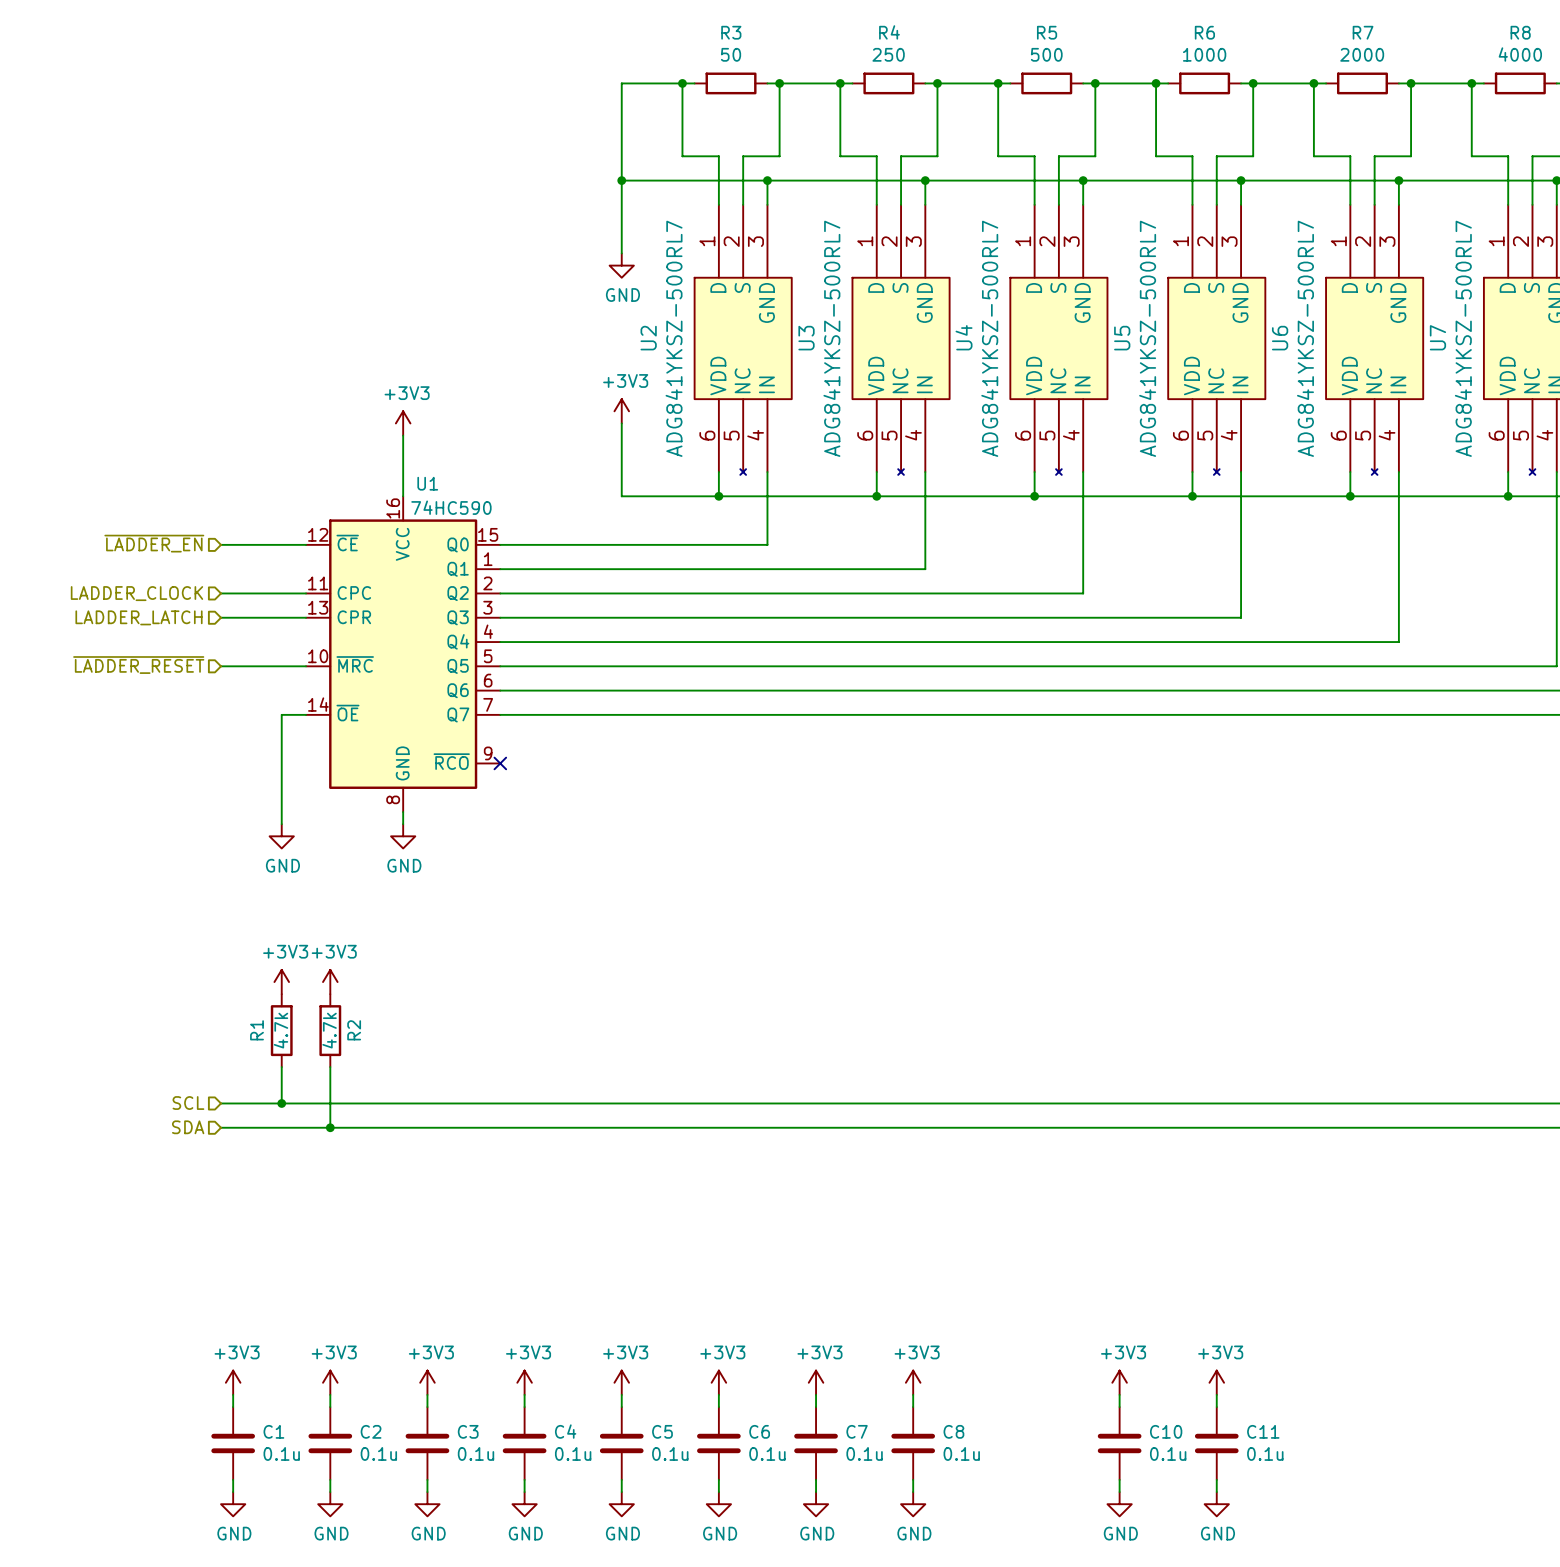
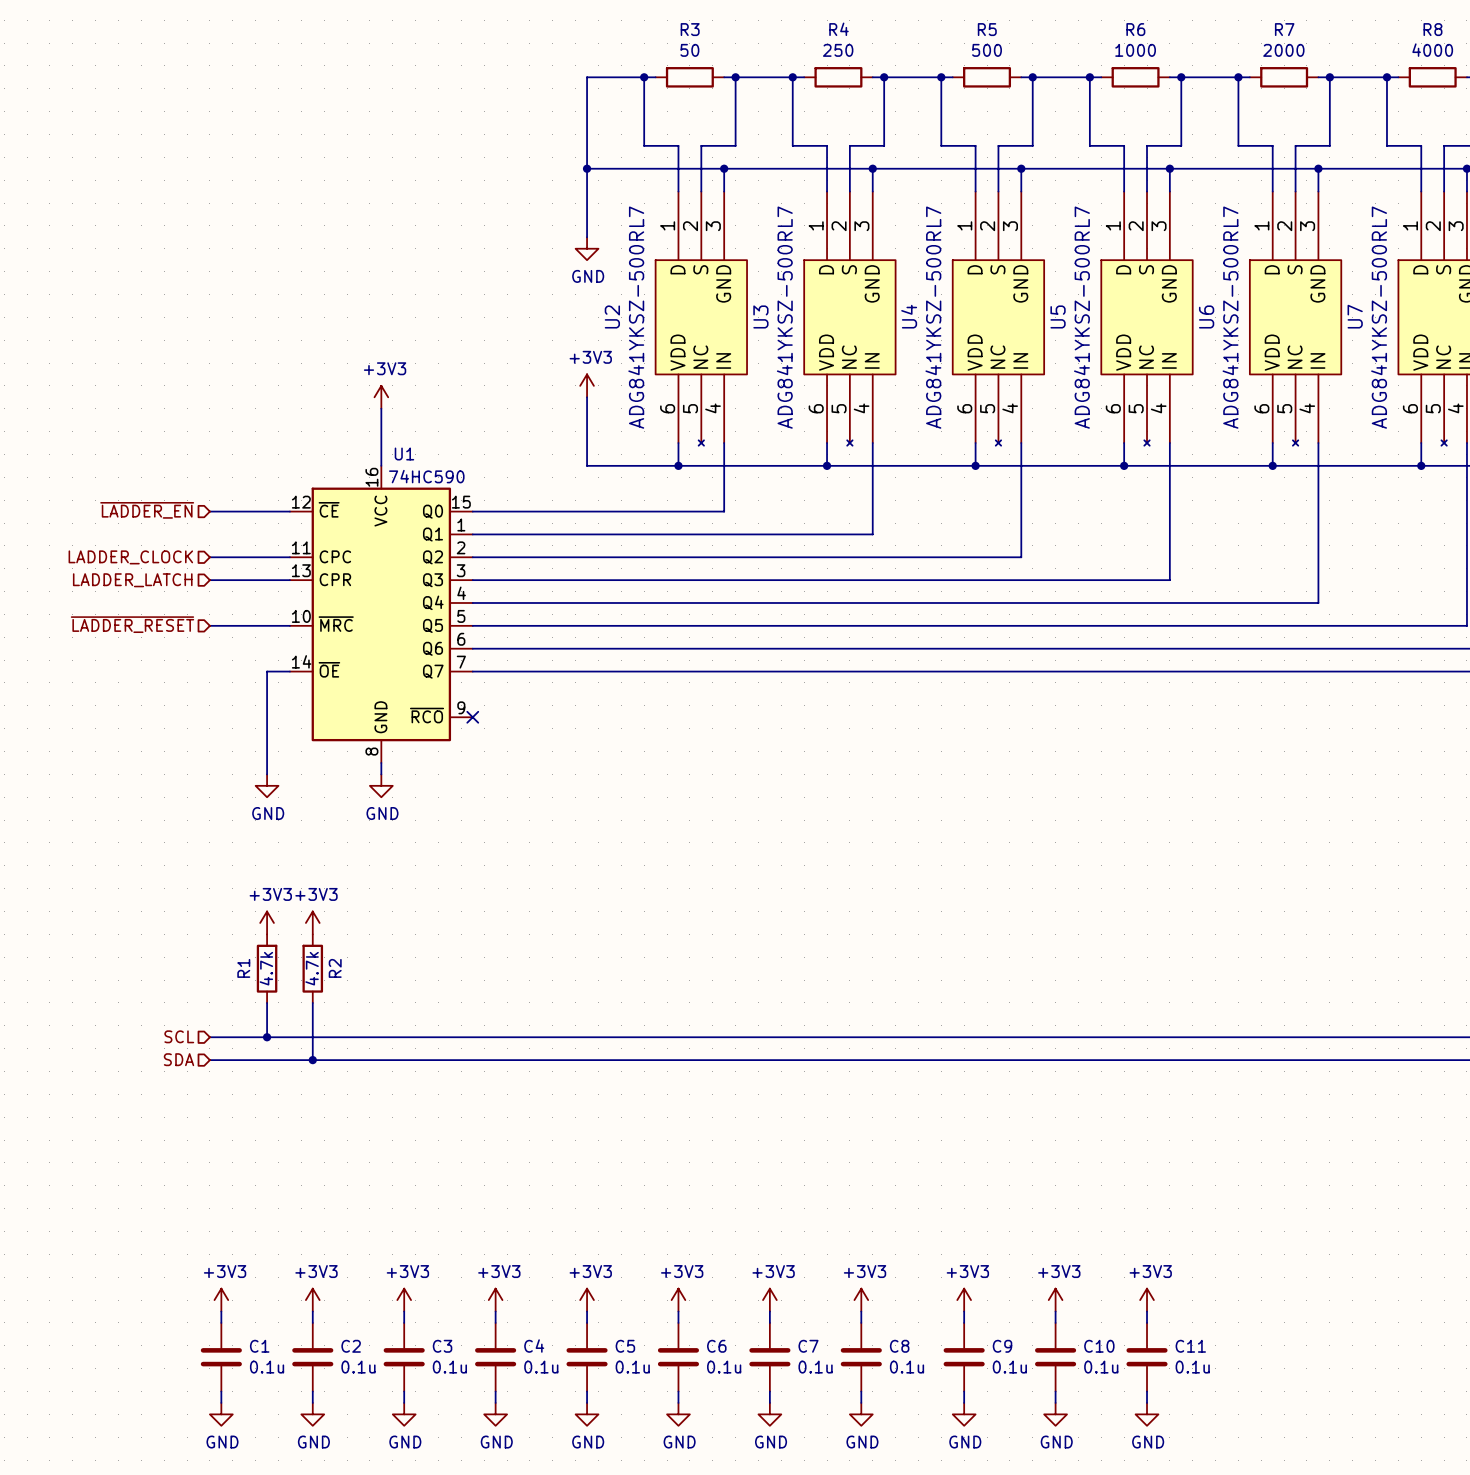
power symbol: none -> +3V3 (964, 1300)
wire: none -> (964, 1311) (964, 1322)
C9: none -> 0.1u (964, 1357)
wire: none -> (964, 1391) (964, 1402)
power symbol: none -> GND (964, 1414)

